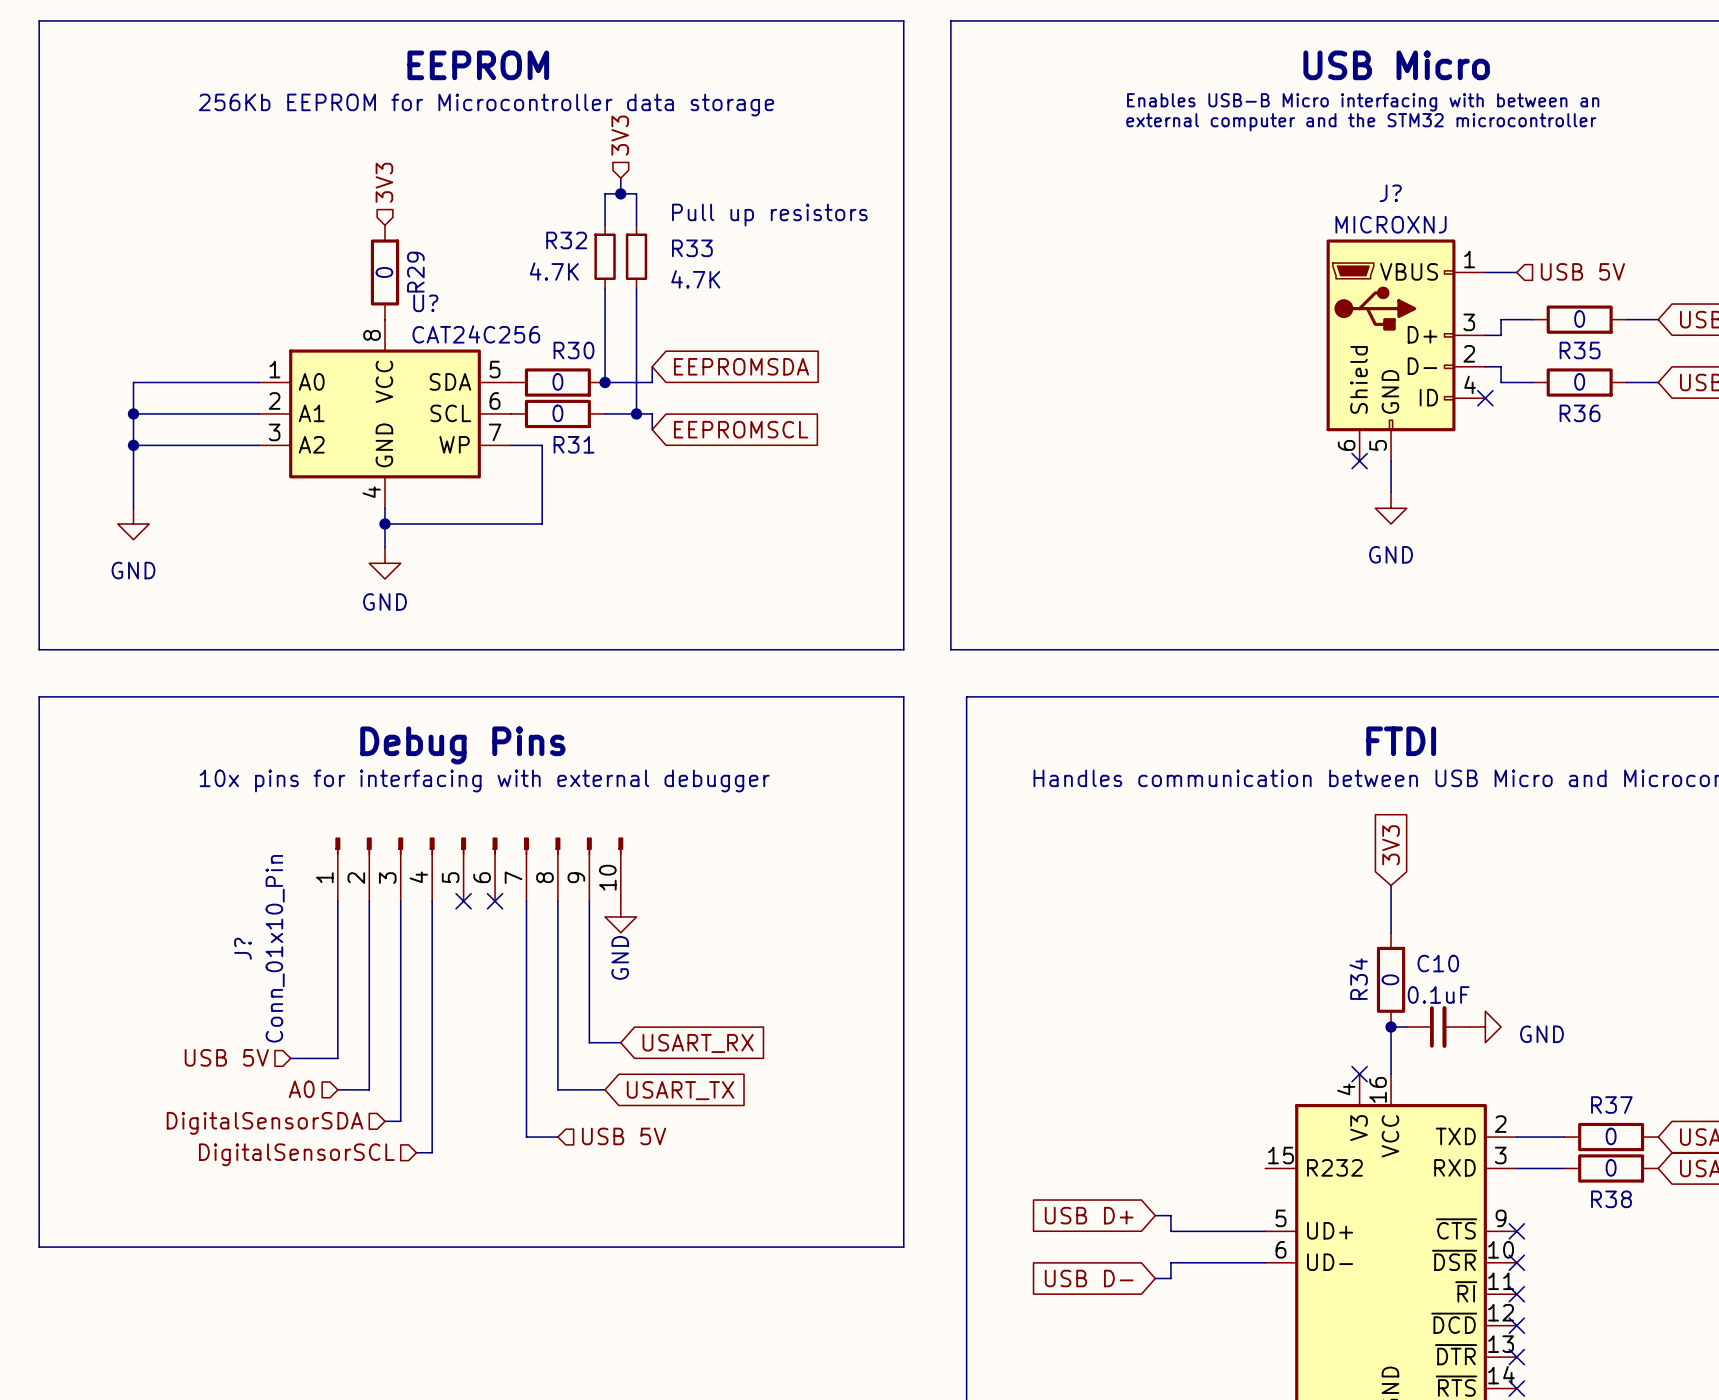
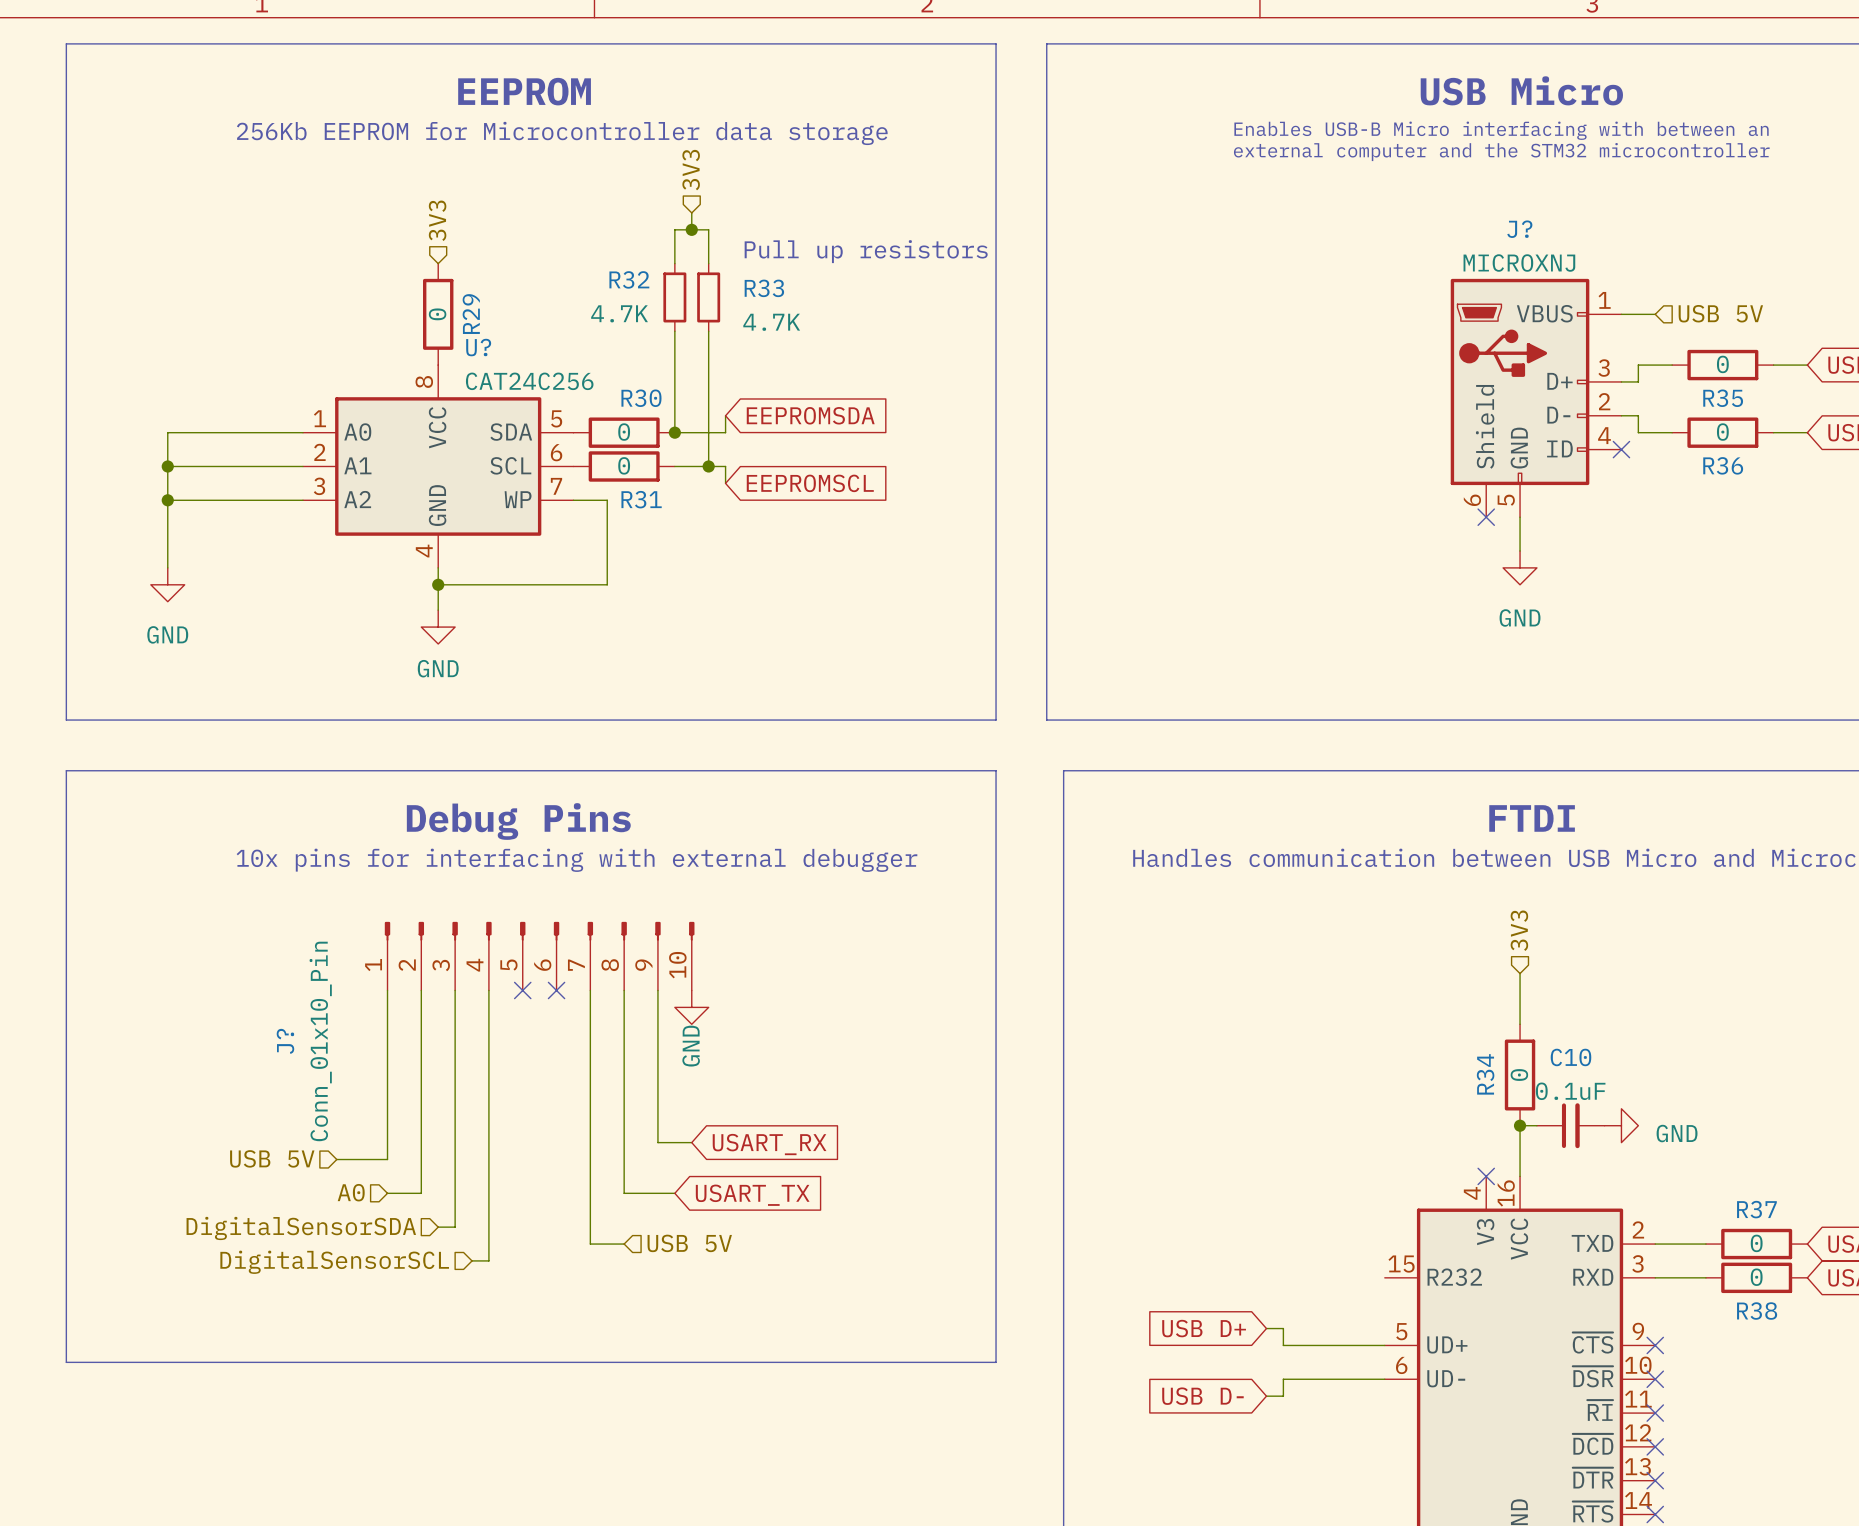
hierarchical label: none -> 3V3 (1519, 930)
global label: 3V3 (1391, 845) -> none

